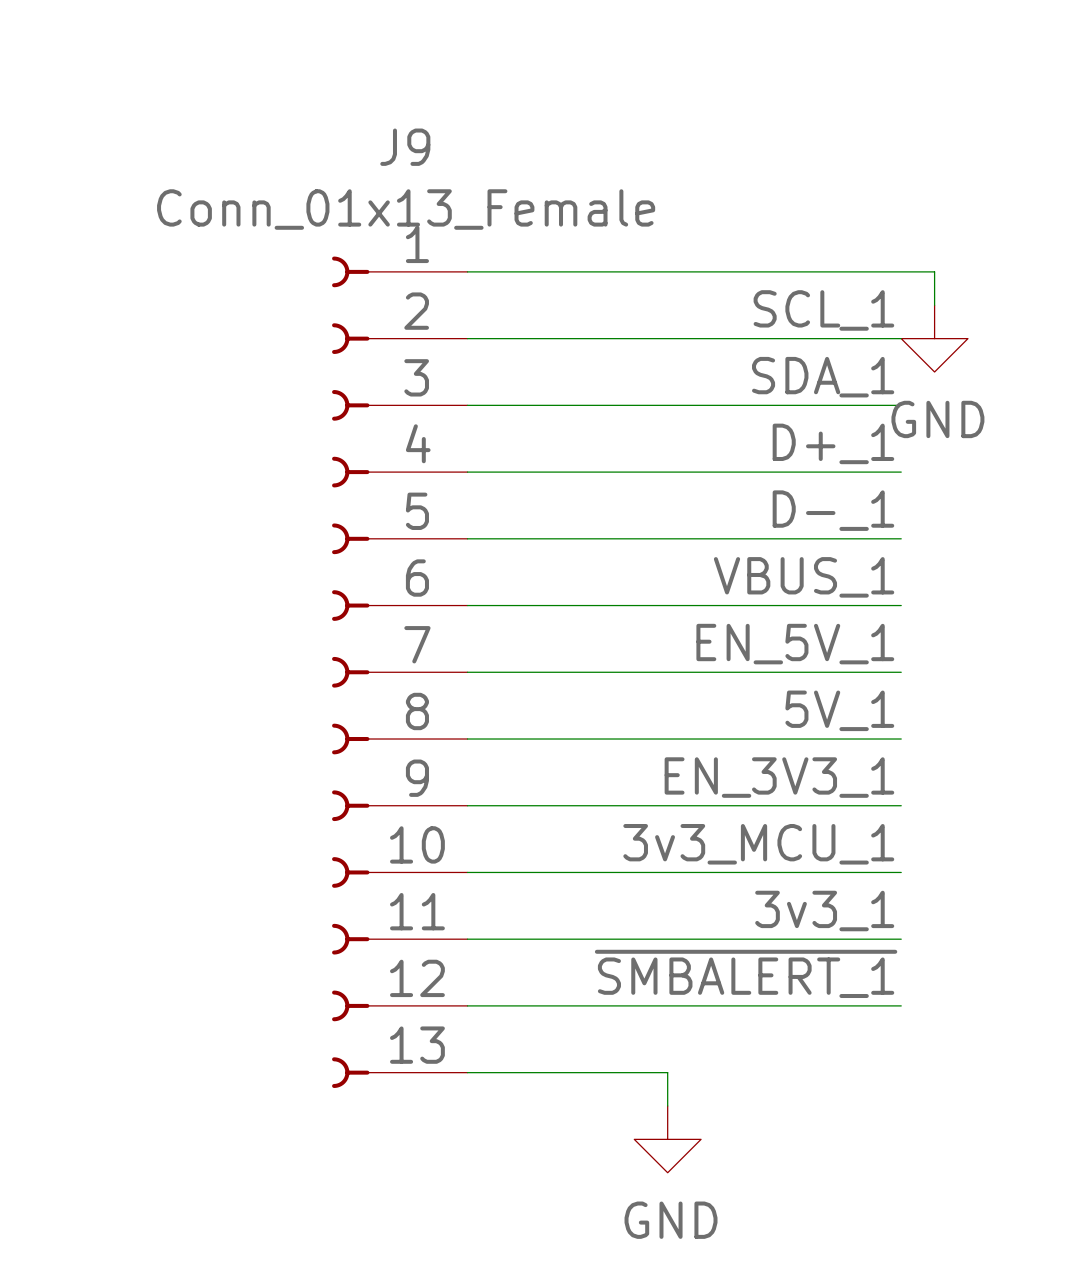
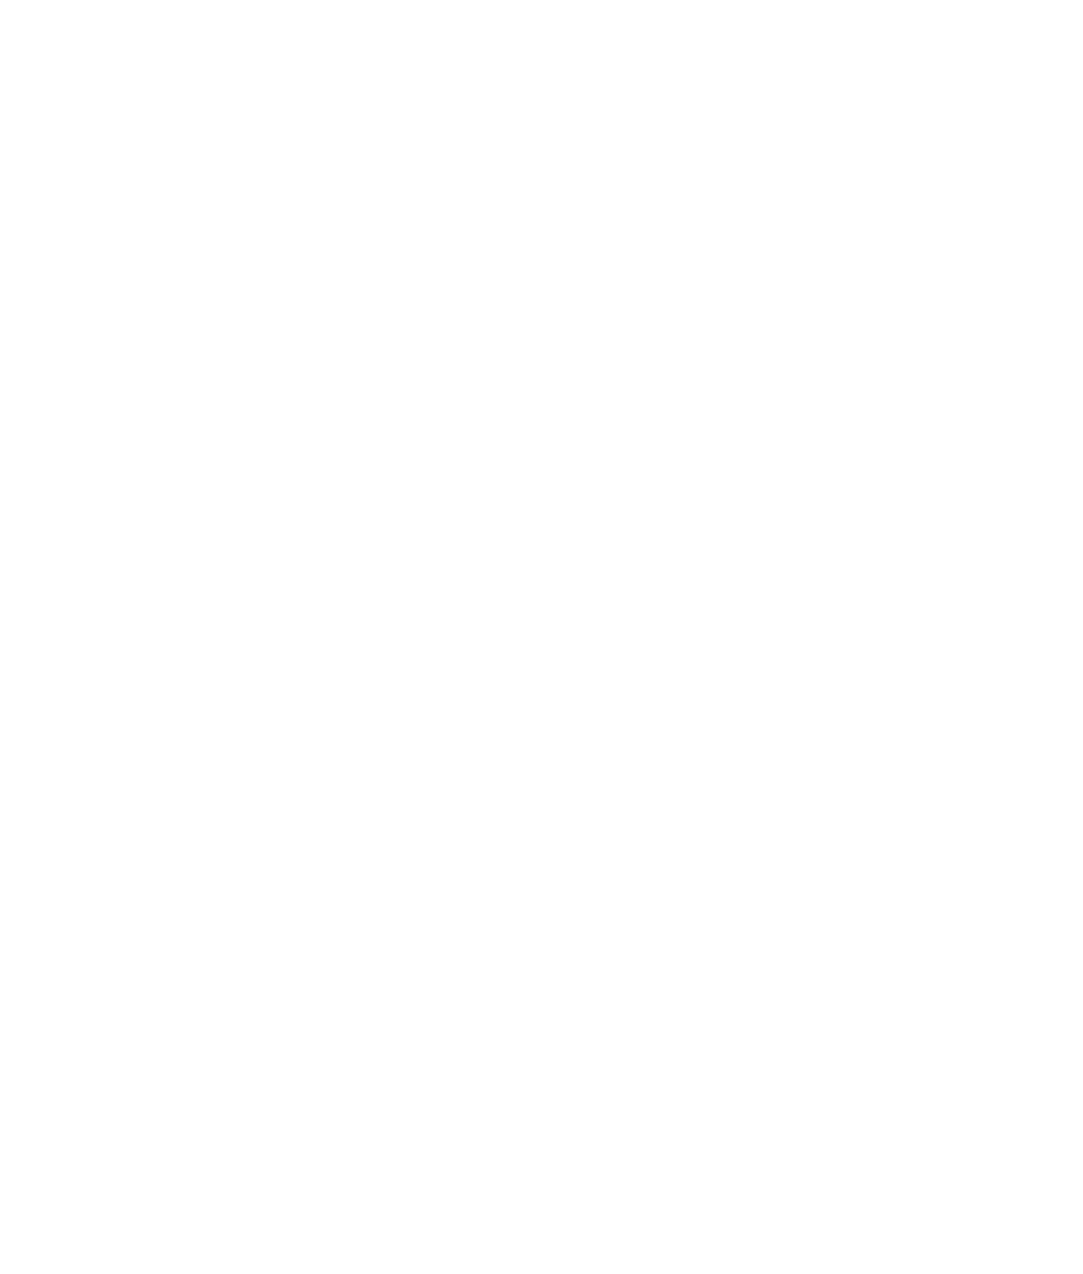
wire: (467, 271) (934, 271) (934, 305) -> none
label: SCL_1 (823, 310) -> none
wire: (467, 338) (901, 338) -> none
power symbol: GND (934, 338) -> none
label: SDA_1 (823, 377) -> none
wire: (467, 405) (901, 405) -> none
label: D+_1 (833, 443) -> none
wire: (467, 472) (901, 472) -> none
label: D-_1 (833, 510) -> none
wire: (467, 538) (901, 538) -> none
label: VBUS_1 (804, 577) -> none
wire: (467, 605) (901, 605) -> none
label: EN_5V_1 (795, 644) -> none
J9: Conn_01x13_Female (399, 672) -> none
wire: (467, 672) (901, 672) -> none
label: 5V_1 (839, 710) -> none
wire: (467, 739) (901, 739) -> none
label: EN_3V3_1 (779, 777) -> none
wire: (467, 805) (901, 805) -> none
label: 3v3_MCU_1 (758, 844) -> none
wire: (467, 872) (901, 872) -> none
label: 3v3_1 (824, 911) -> none
wire: (467, 939) (901, 939) -> none
label: ~{SMBALERT_1} (746, 973) -> none
wire: (467, 1005) (901, 1005) -> none
wire: (467, 1072) (667, 1072) (667, 1106) -> none
power symbol: GND (667, 1139) -> none

